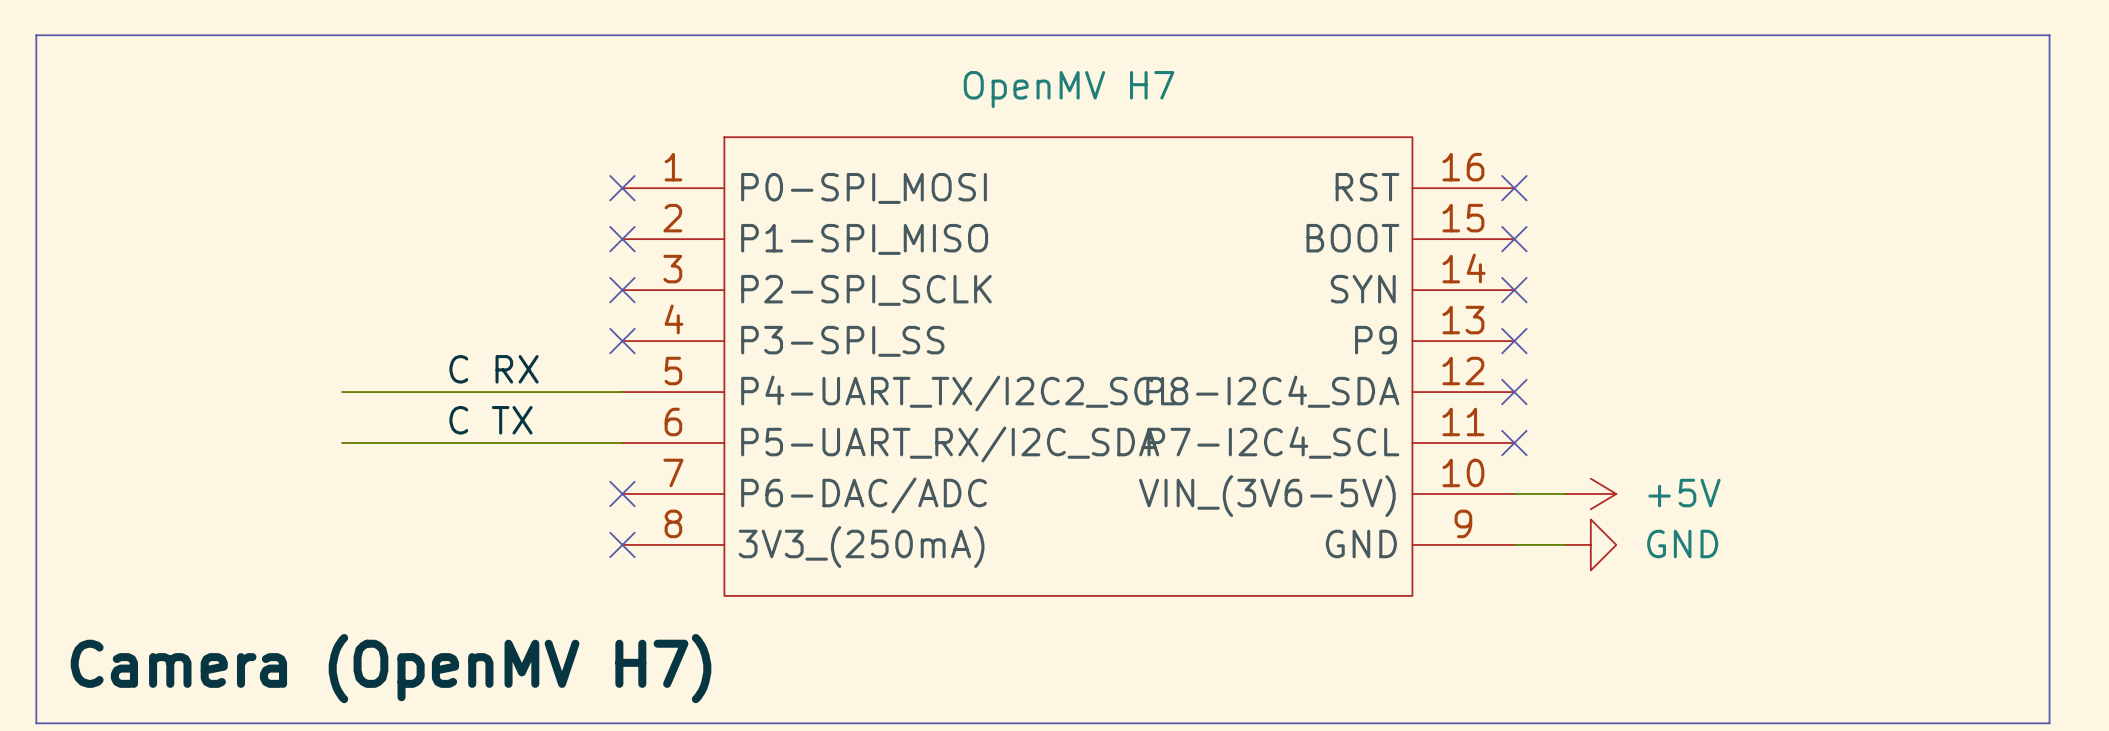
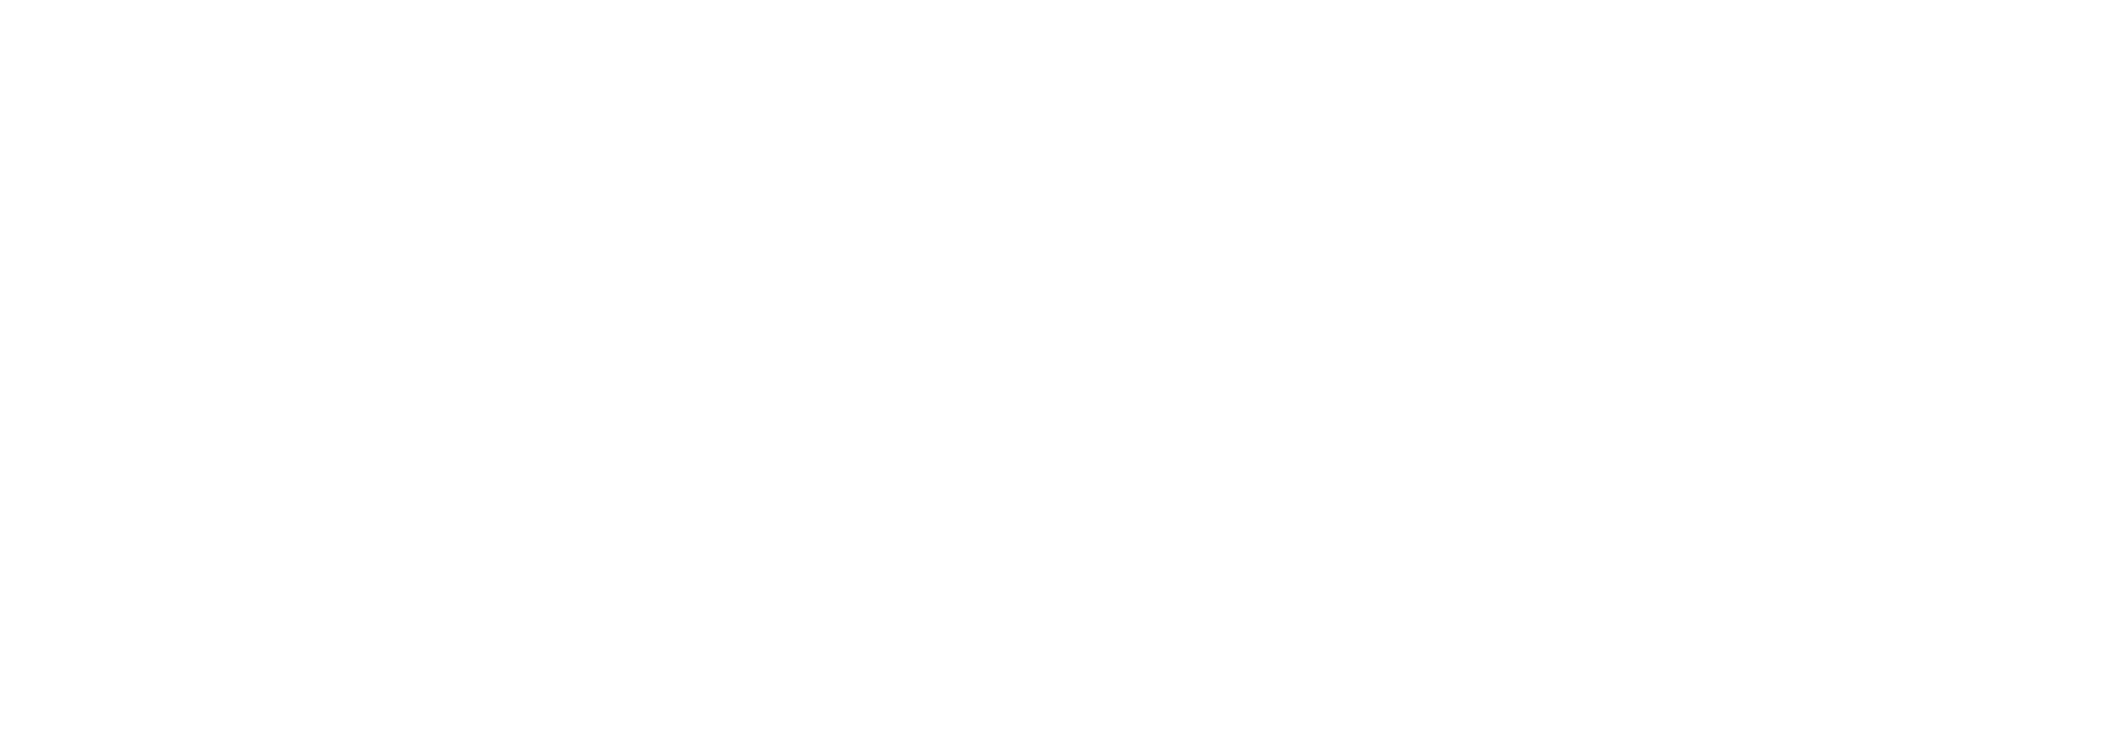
line: (36, 35) (2049, 35) (2049, 723) (36, 723) (36, 35) -> none
no-connect mark: (622, 188) -> none
no-connect mark: (1514, 188) -> none
no-connect mark: (622, 239) -> none
no-connect mark: (1514, 239) -> none
no-connect mark: (622, 290) -> none
no-connect mark: (1514, 290) -> none
no-connect mark: (622, 341) -> none
no-connect mark: (1514, 341) -> none
part: OpenMV H7 (1068, 366) -> none
label: C RX (494, 369) -> none
wire: (342, 392) (622, 392) -> none
no-connect mark: (1514, 392) -> none
label: C TX (490, 420) -> none
wire: (342, 443) (622, 443) -> none
no-connect mark: (1514, 443) -> none
no-connect mark: (622, 493) -> none
wire: (1514, 493) (1565, 493) -> none
power symbol: +5V (1590, 493) -> none
no-connect mark: (622, 544) -> none
wire: (1514, 544) (1565, 544) -> none
power symbol: GND (1590, 544) -> none
label: Camera (OpenMV H7) (391, 668) -> none

